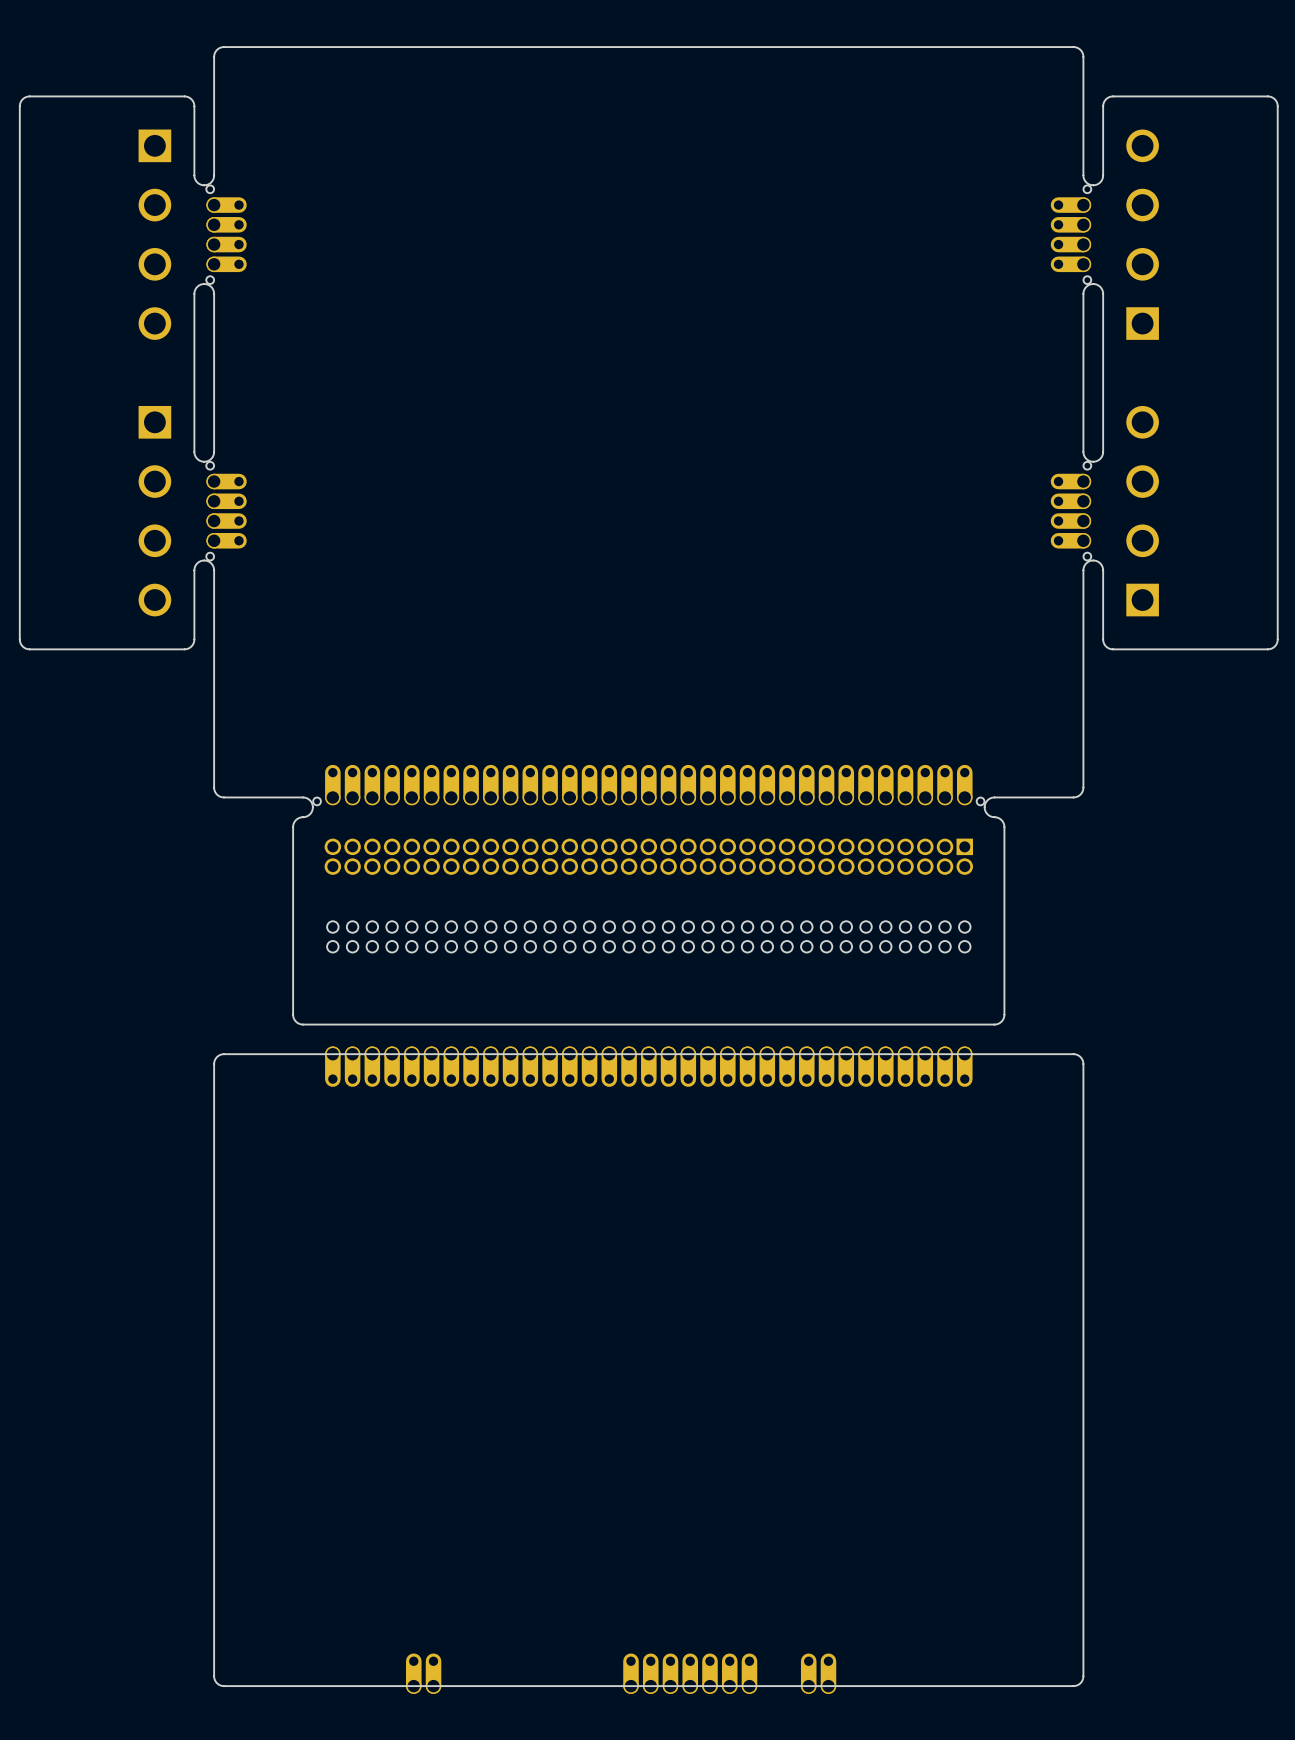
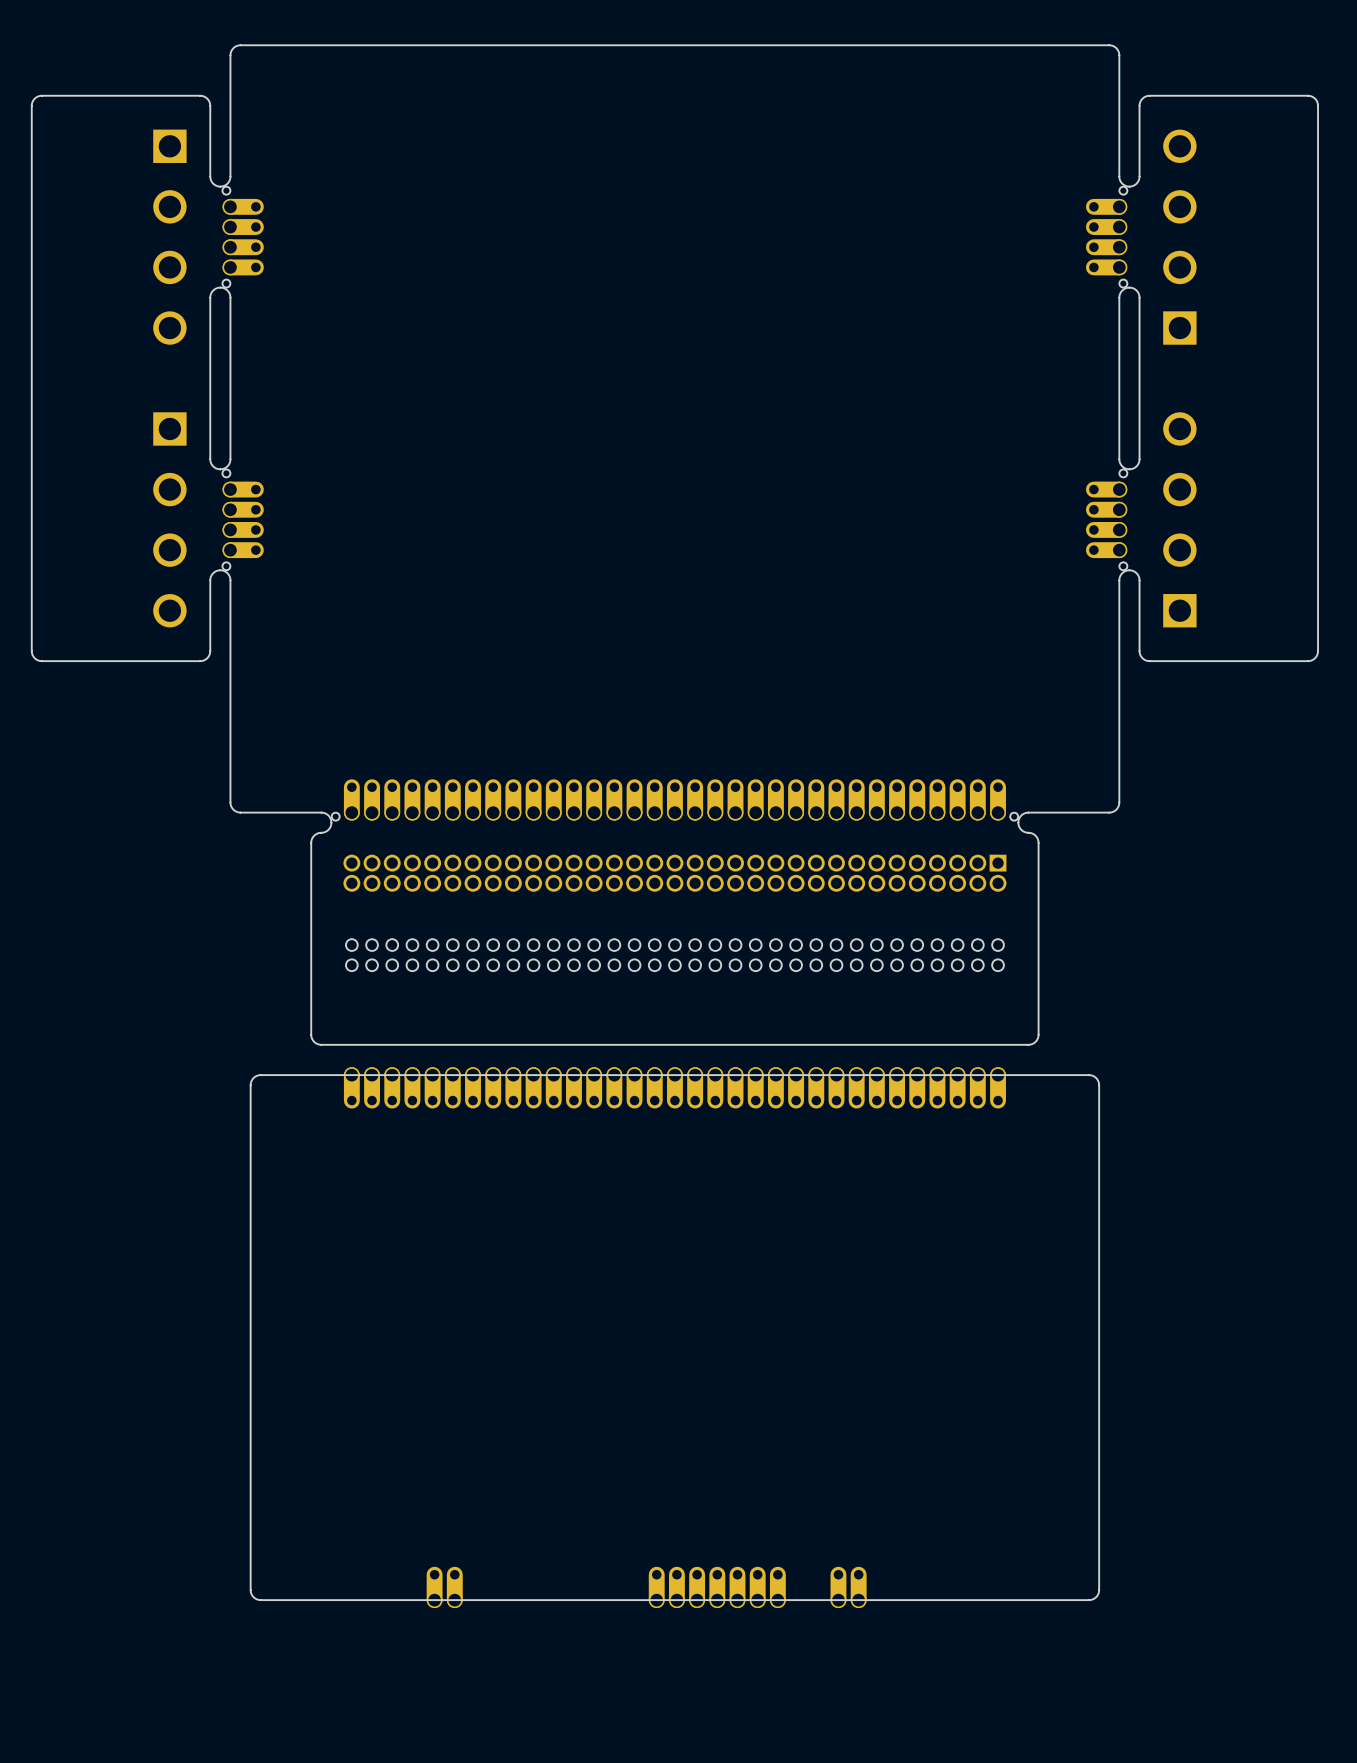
board edge: (1053, 1054) (1076, 1054) (1081, 1057) (1083, 1064) (1083, 1676) (1080, 1683) (1073, 1686) (224, 1686) (217, 1683) (214, 1676) (214, 1064) (216, 1057) (220, 1054) (243, 1054) -> (1089, 1075) (1096, 1078) (1099, 1085) (1099, 1590) (1096, 1597) (1089, 1600) (260, 1600) (255, 1598) (250, 1590) (250, 1085) (253, 1078) (260, 1075)
part: none -> (434, 1587)
part: none -> (454, 1587)
part: none -> (656, 1587)
part: none -> (676, 1587)
part: none -> (697, 1587)
part: none -> (717, 1587)
part: none -> (737, 1587)
part: none -> (757, 1587)
part: none -> (777, 1587)
part: none -> (838, 1587)
part: none -> (858, 1587)
part: (413, 1673) -> none
part: (433, 1673) -> none
part: (631, 1673) -> none
part: (650, 1673) -> none
part: (670, 1673) -> none
part: (690, 1673) -> none
part: (709, 1673) -> none
part: (729, 1673) -> none
part: (749, 1673) -> none
part: (808, 1673) -> none
part: (828, 1673) -> none

